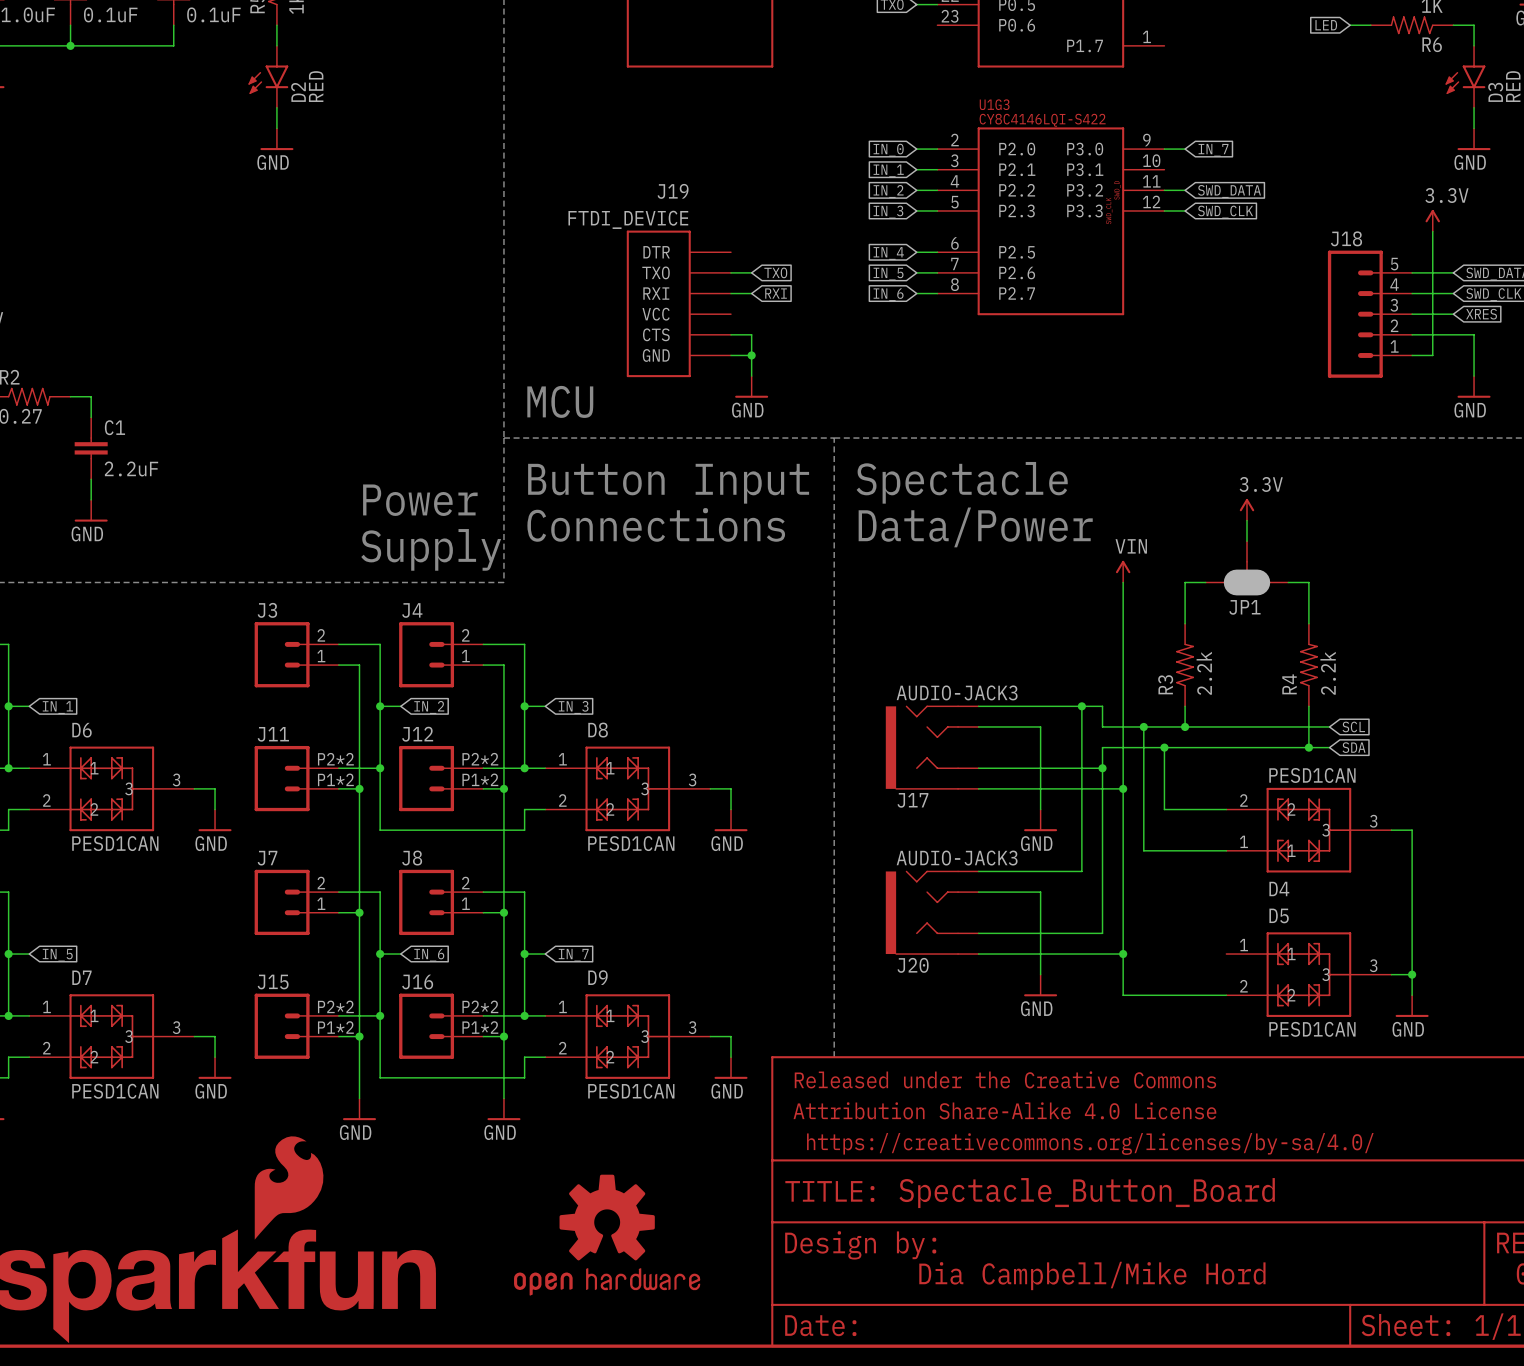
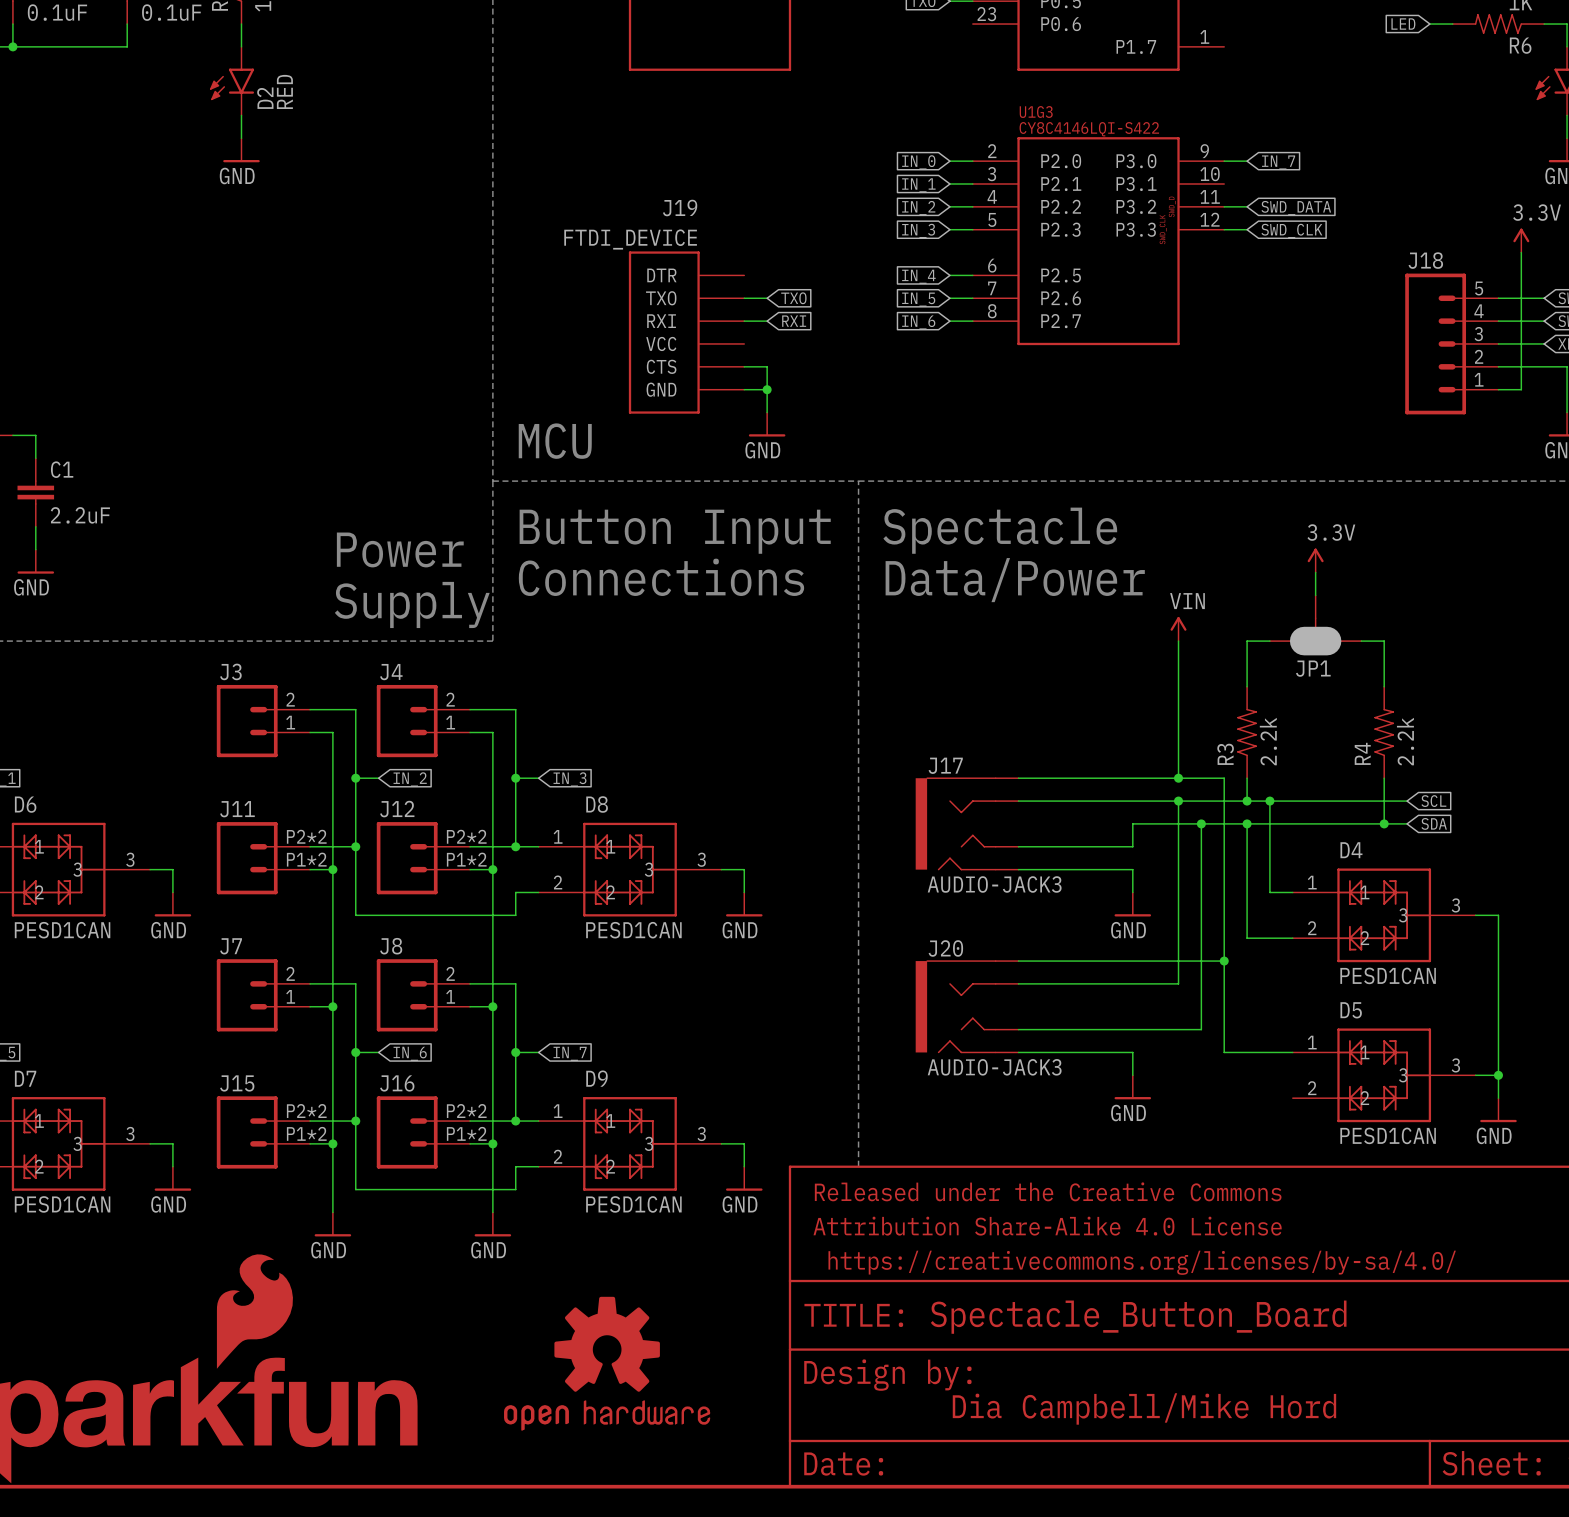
wire: (1081, 706) (1081, 747) -> (1155, 823) (1132, 823)
junction: (1081, 706) -> none
wire: (1102, 706) (1102, 726) -> (1087, 801) (1155, 801)
wire: none -> (1155, 778) (1224, 778) (1224, 823)
wire: (1123, 706) (1123, 726) -> none
junction: none -> (1178, 778)
wire: (1040, 726) (1040, 809) -> none
junction: none -> (1178, 801)
wire: (1143, 726) (1143, 747) -> none
junction: (1143, 726) -> none
junction: none -> (1269, 801)
J17 flip: as is (922, 747) -> up-down (956, 823)
wire: (1102, 747) (1102, 933) -> (1201, 938) (1201, 1029) (1155, 1029)
junction: none -> (1201, 823)
junction: (1164, 747) -> none
junction: none -> (1247, 823)
wire: (1102, 768) (1081, 768) (1081, 788) (1123, 788) -> none
junction: (1102, 768) -> none
junction: (1123, 788) -> none
wire: (1081, 809) (1081, 871) -> (1224, 961) (1132, 961)
wire: (1164, 809) (1205, 809) -> (1269, 801) (1269, 892)
wire: none -> (1224, 892) (1224, 1052) (1292, 1052)
power symbol position: GND (1040, 820) -> GND (1132, 904)
D4 flip: as is (1308, 830) -> up-down (1384, 915)
wire: (1143, 850) (1185, 850) -> (1247, 823) (1247, 938)
junction: none -> (1224, 961)
wire: (1040, 892) (1040, 974) -> (1087, 983) (1178, 983)
wire: (1123, 892) (1123, 995) (1226, 995) -> none
J20 flip: as is (922, 912) -> up-down (956, 1006)
wire: (1081, 954) (1123, 954) -> (1132, 1052) (1132, 1075)
junction: (1123, 954) -> none
power symbol position: GND (1040, 985) -> GND (1132, 1087)

